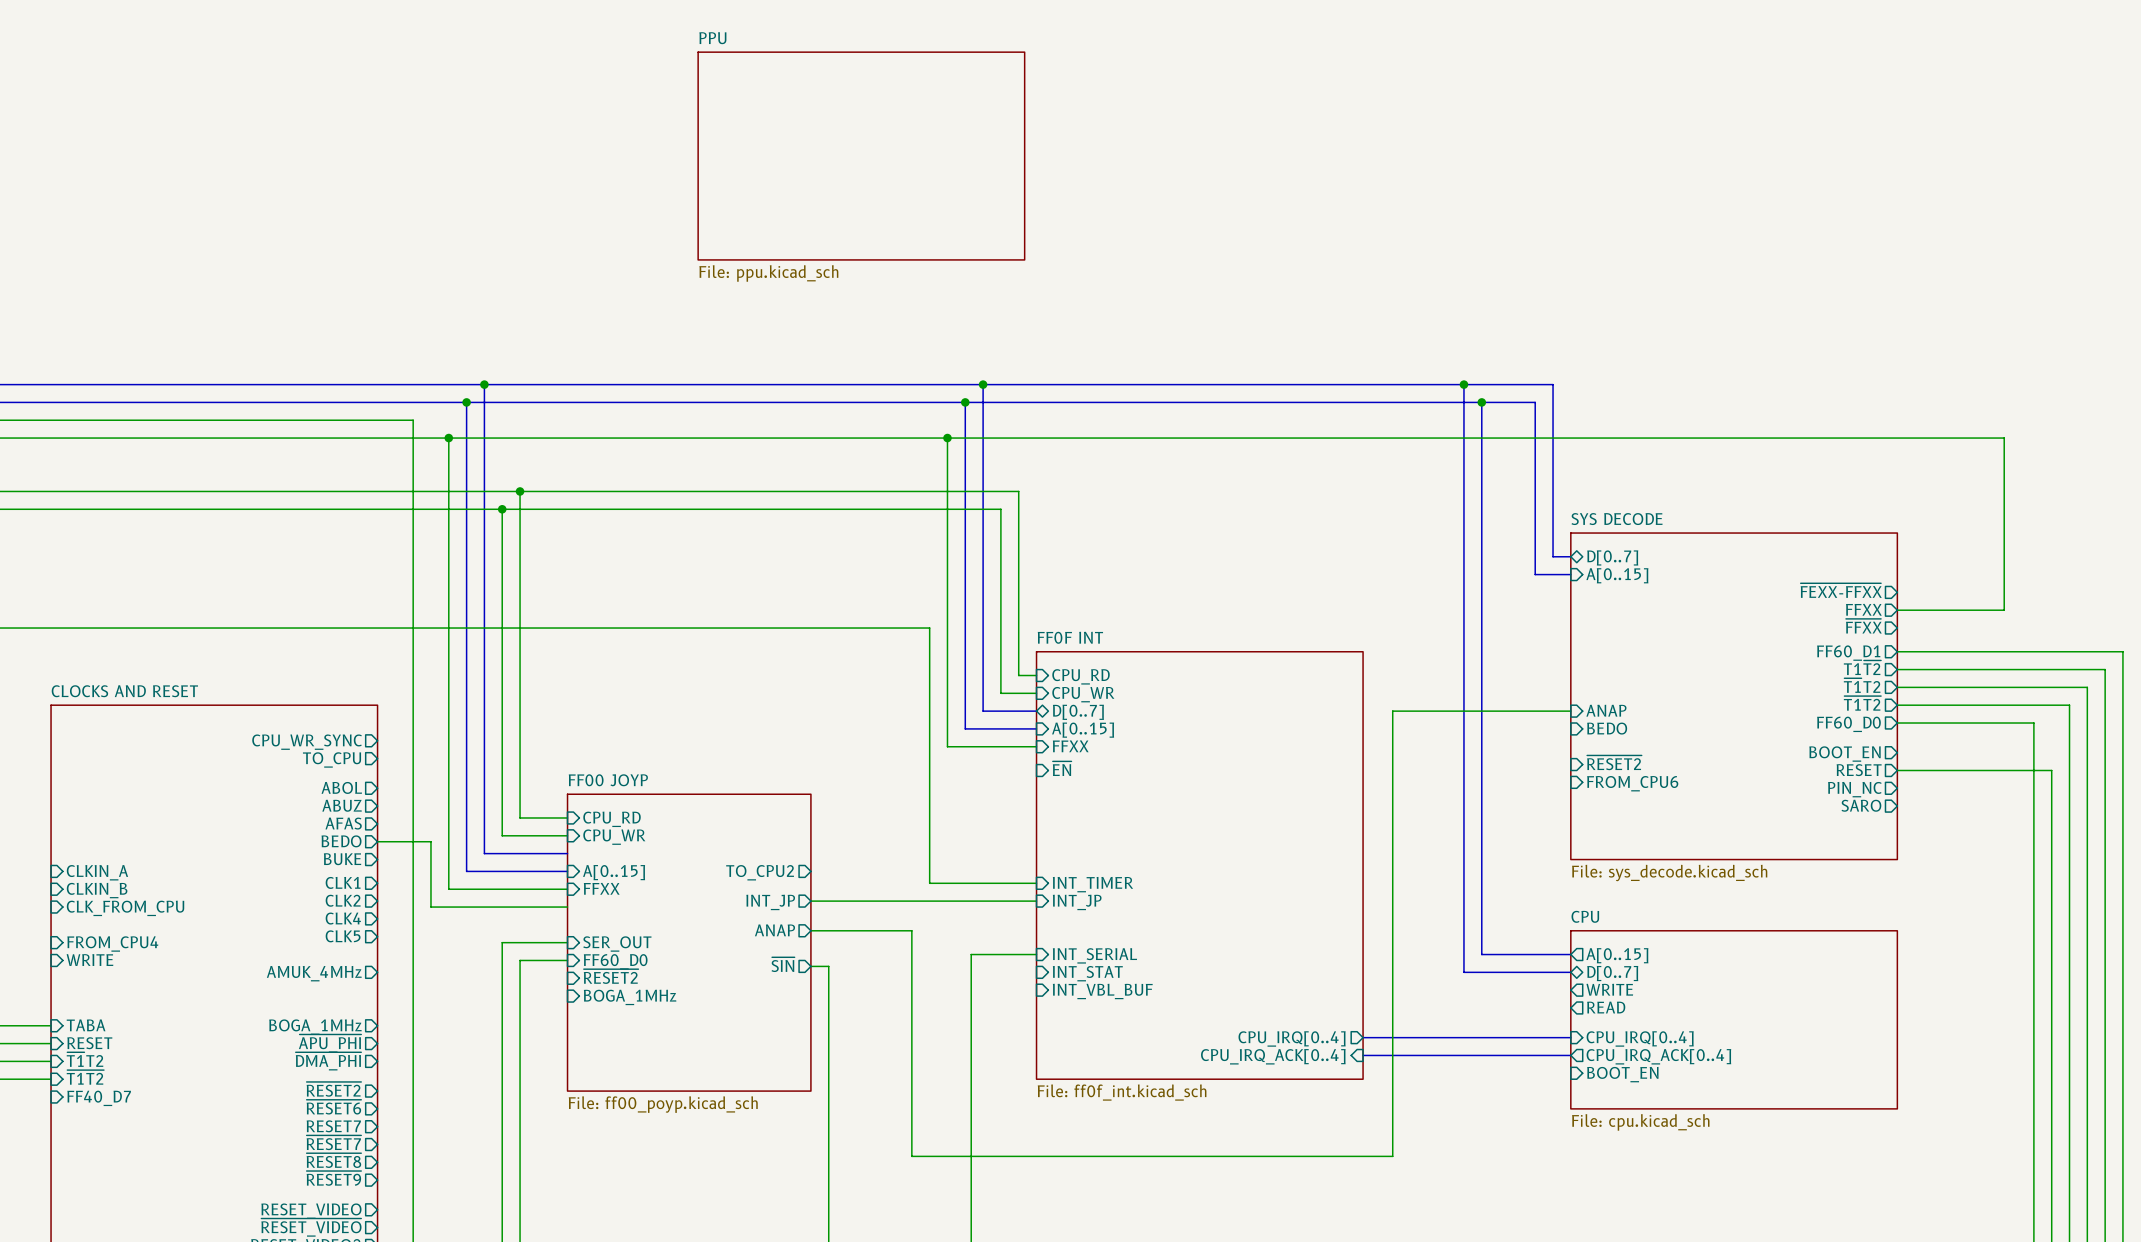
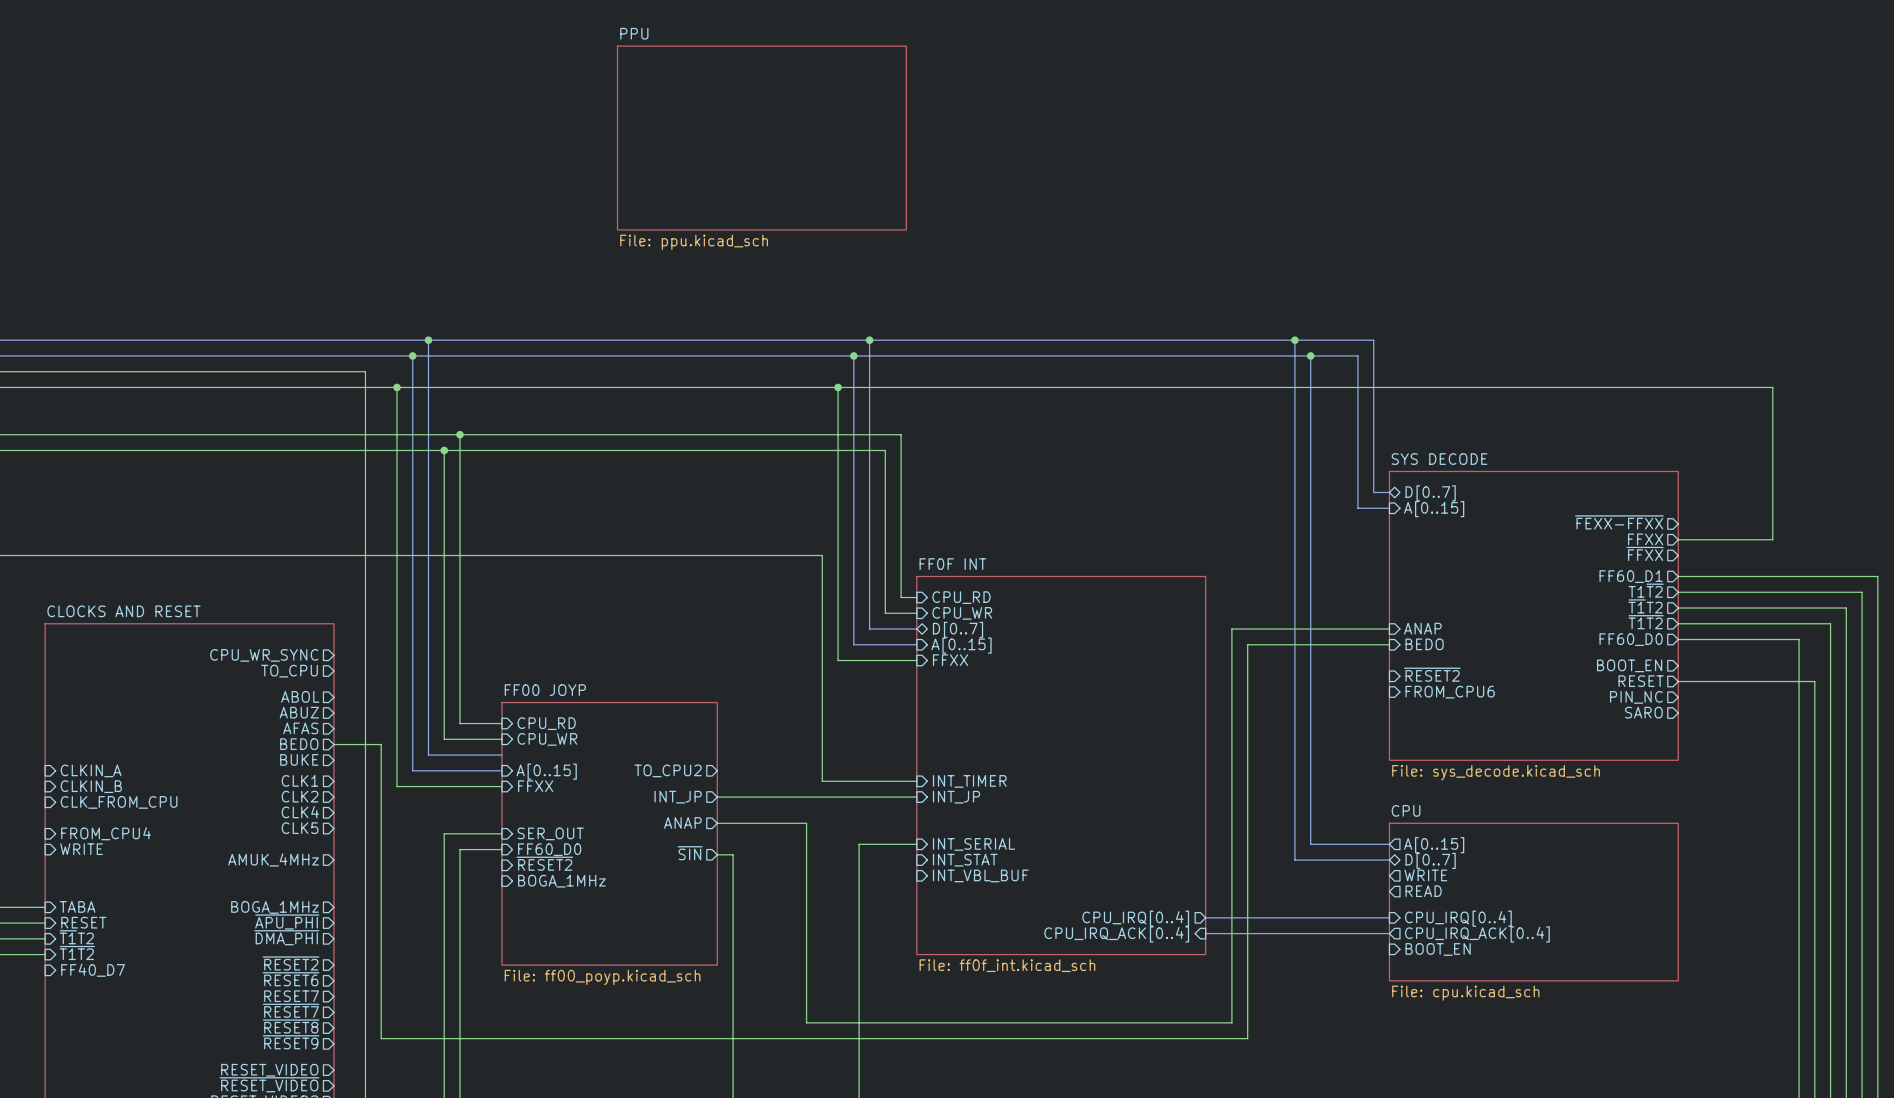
sheet pin: ~{EN} (1062, 768) -> none
wire: (430, 907) (567, 907) -> (381, 802) (381, 1038) (1247, 1038) (1247, 644) (1389, 644)

